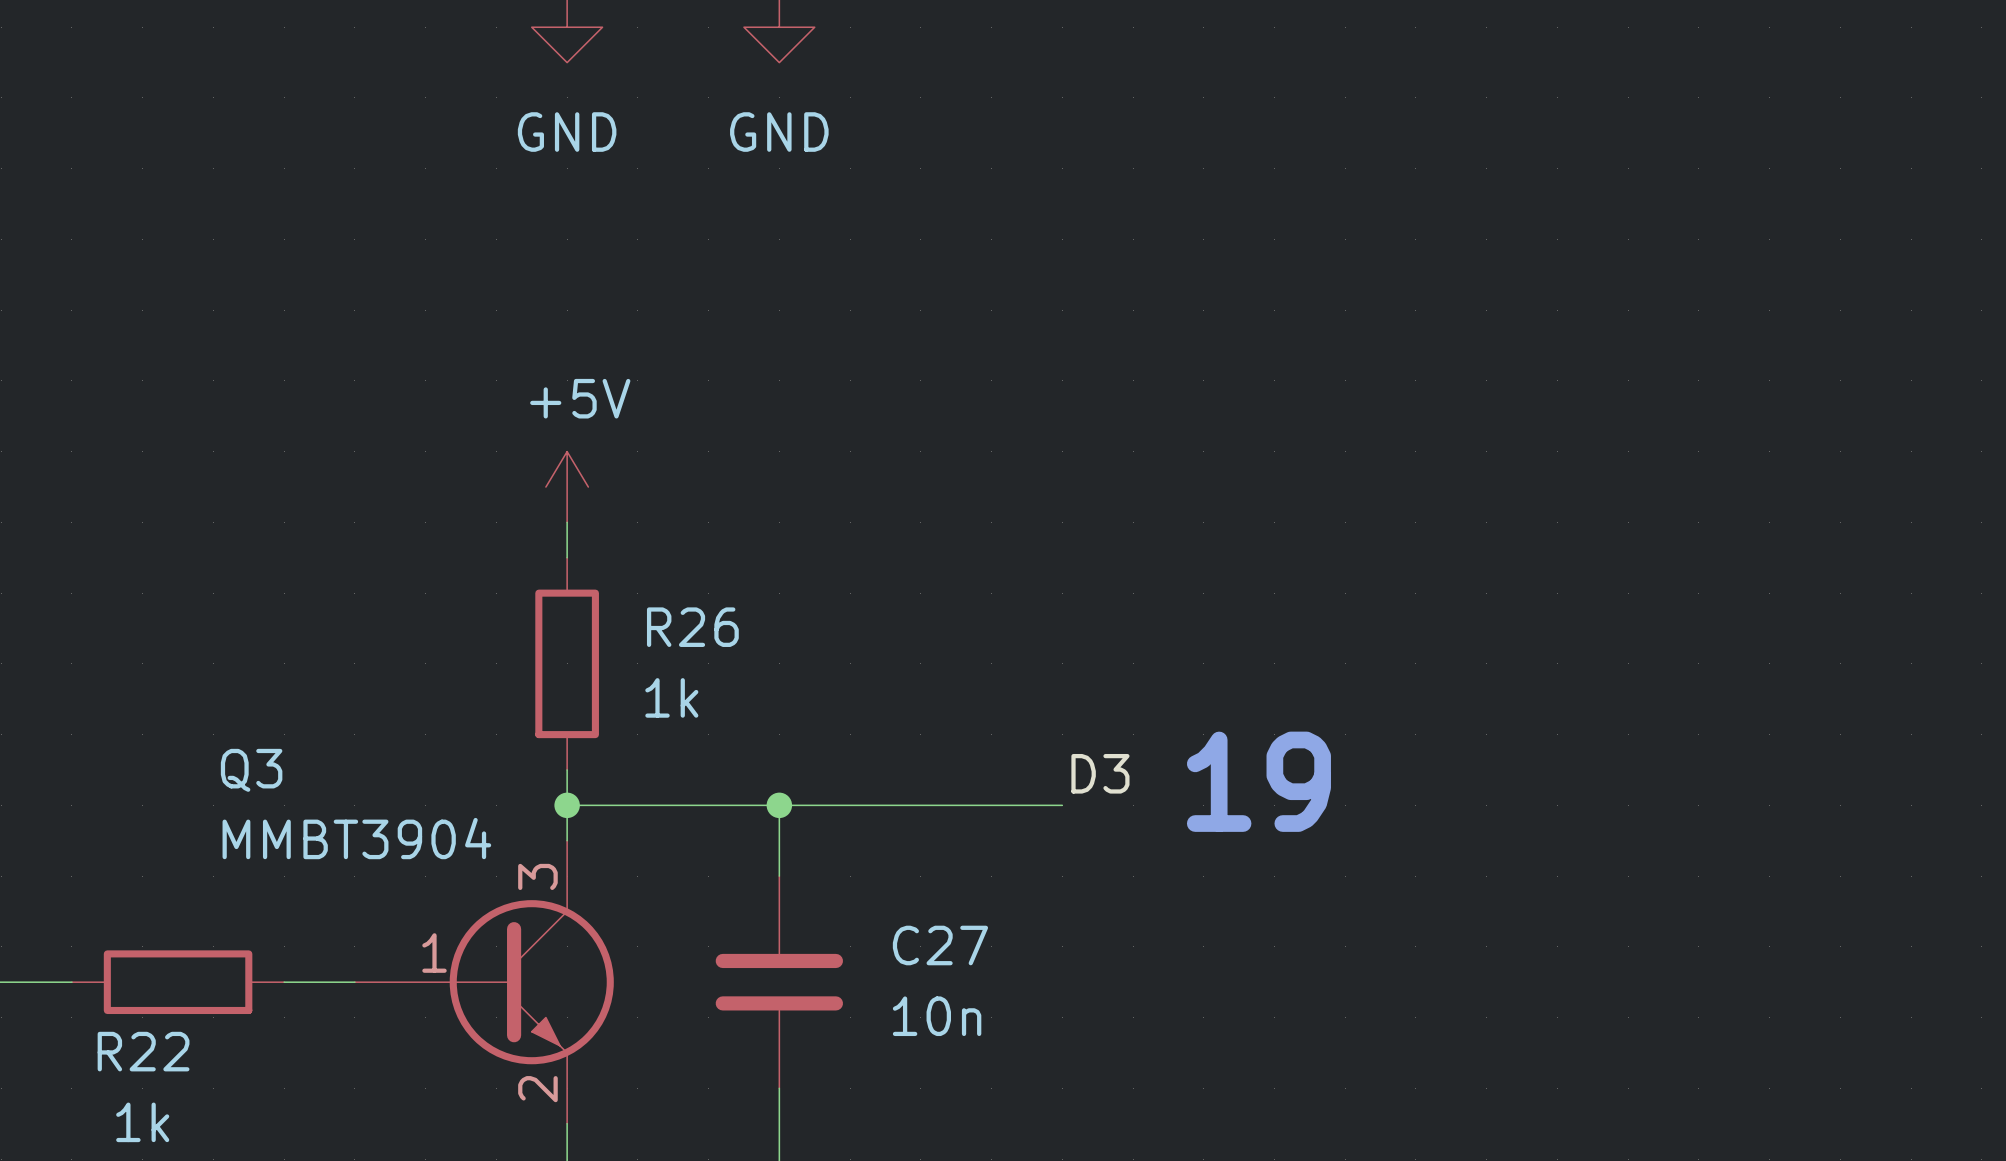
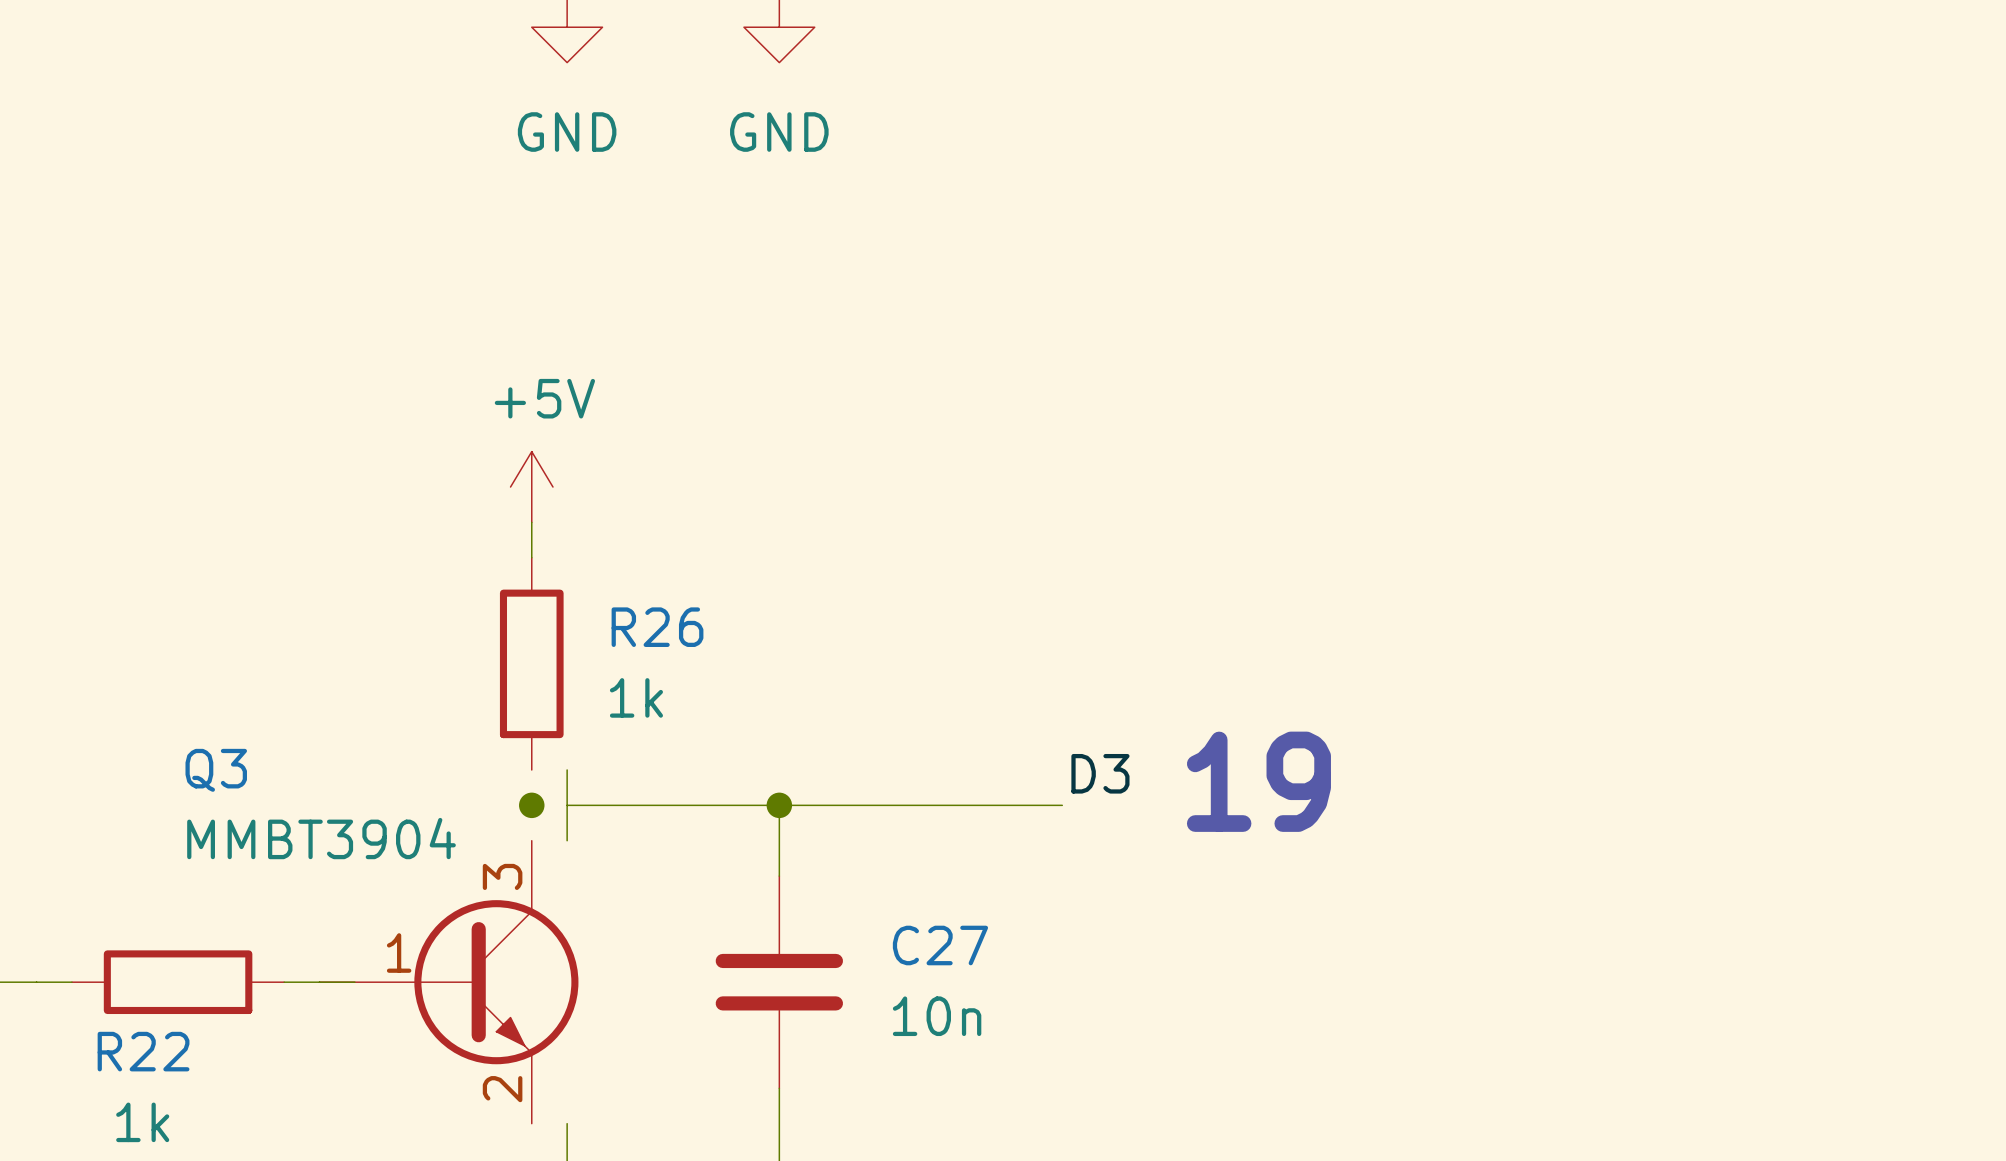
power symbol position: +5V (567, 487) -> +5V (531, 487)
wire: (567, 522) (567, 557) -> (531, 522) (531, 557)
R26 position: (567, 663) -> (531, 663)
junction position: (567, 805) -> (531, 805)
Q3 position: (484, 982) -> (449, 982)

